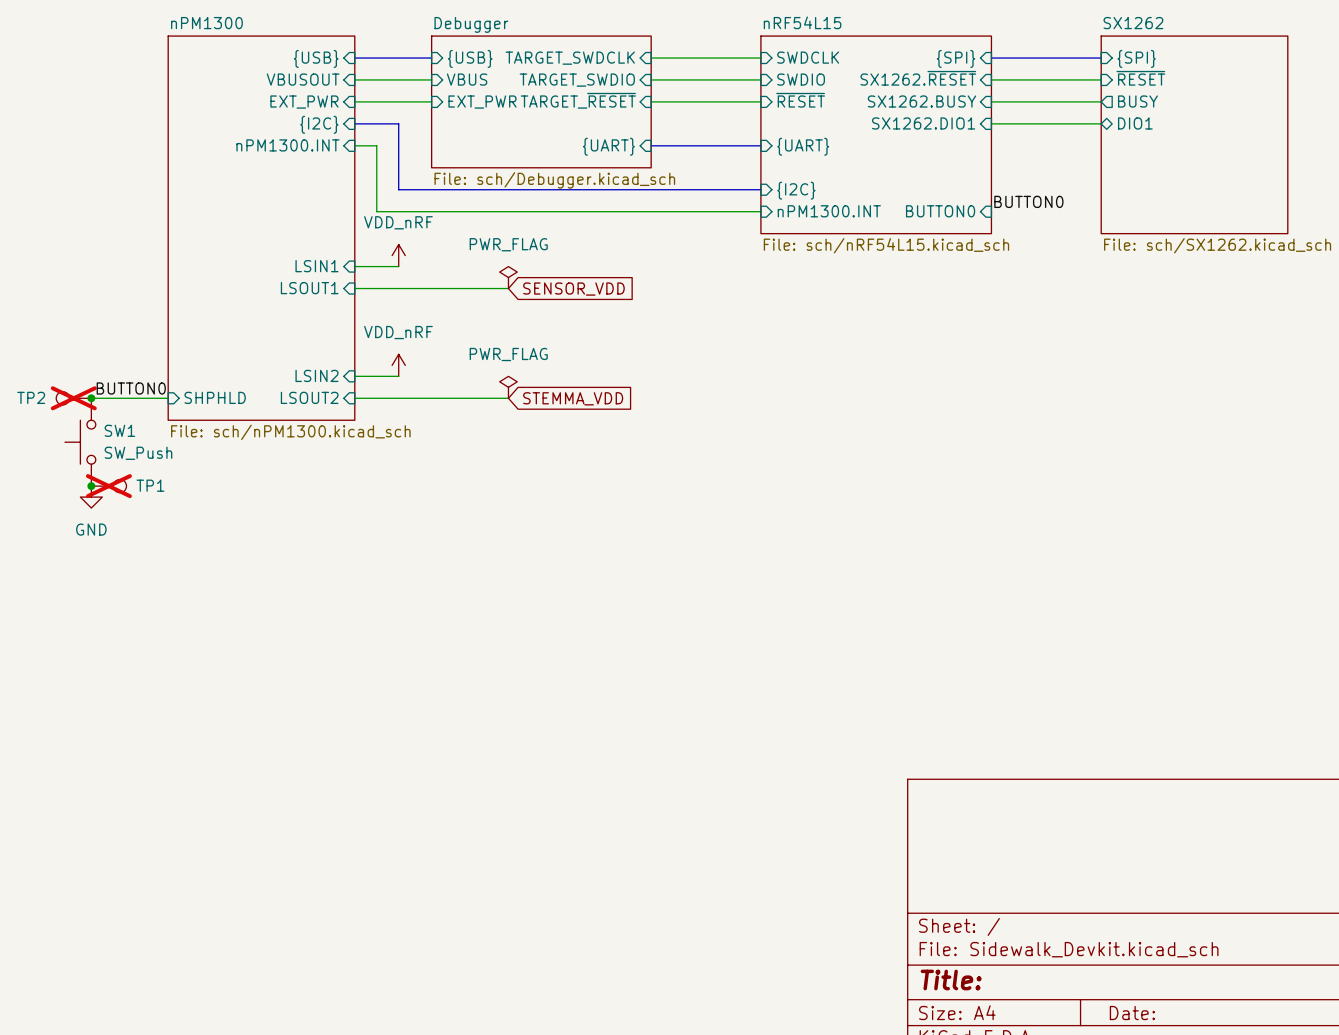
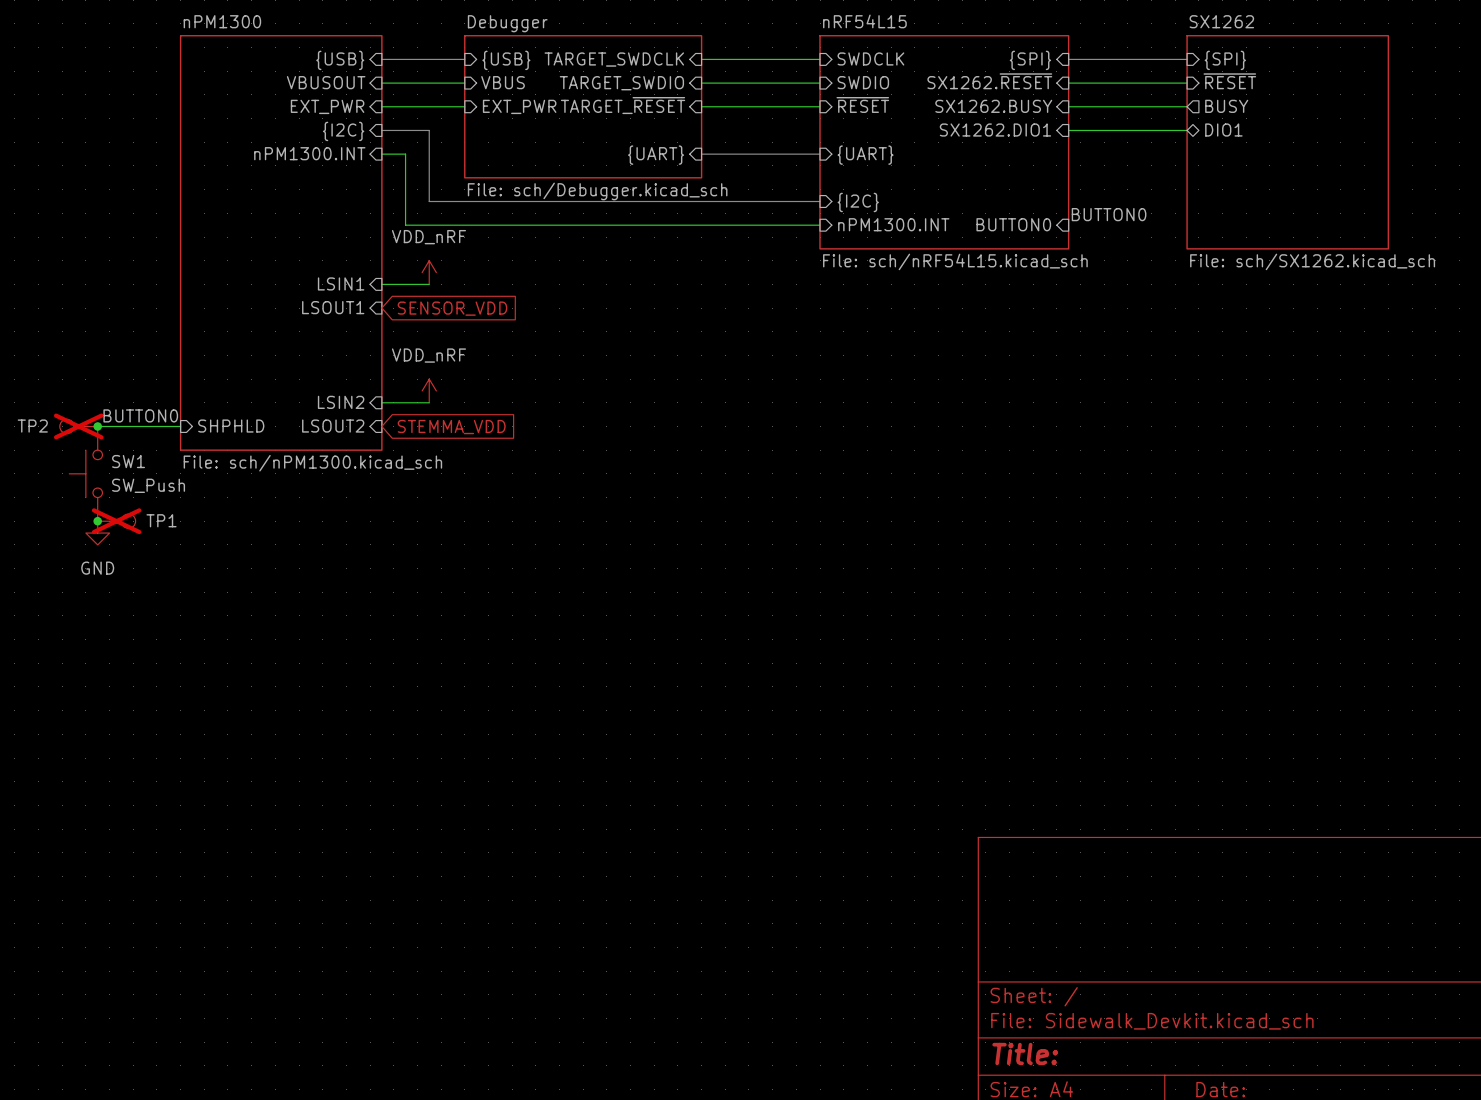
power symbol: PWR_FLAG (508, 277) -> none
wire: (354, 288) (508, 288) -> none
global label position: SENSOR_VDD (573, 289) -> SENSOR_VDD (452, 308)
power symbol: PWR_FLAG (508, 387) -> none
wire: (354, 398) (508, 398) -> none
global label position: STEMMA_VDD (573, 398) -> STEMMA_VDD (451, 427)

